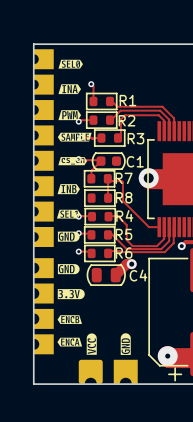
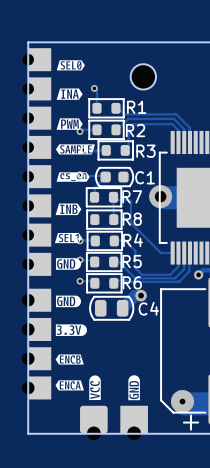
part: none -> (143, 76)

